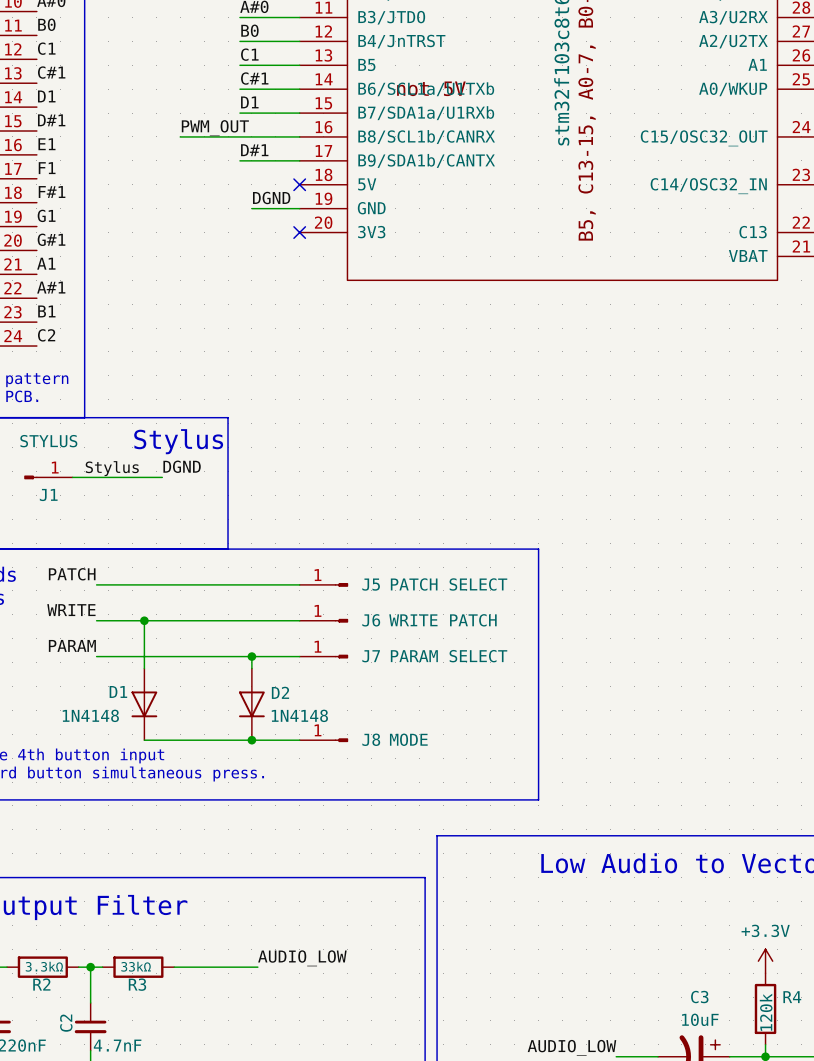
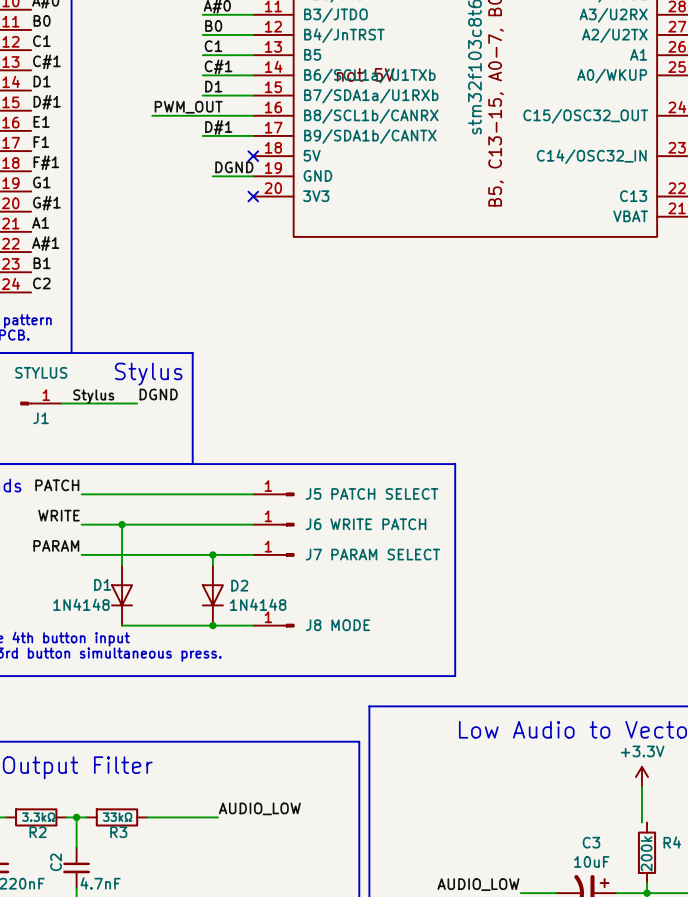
wire: none -> (641, 787) (641, 822)
power symbol position: +3.3V (765, 961) -> +3.3V (641, 777)
R4 value: 120k (766, 1012) -> 200k (646, 853)

